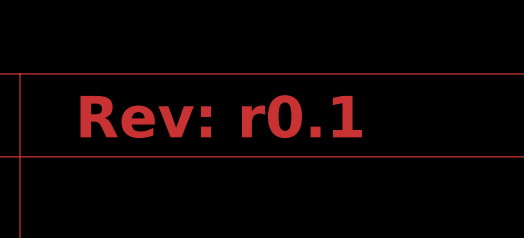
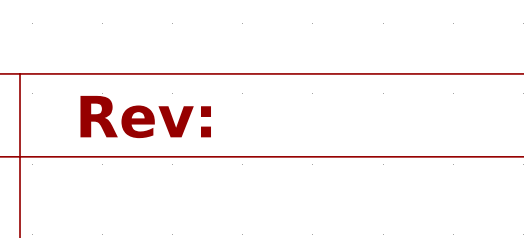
title block: Rev: r0.1 (221, 116) -> Rev: (145, 117)

